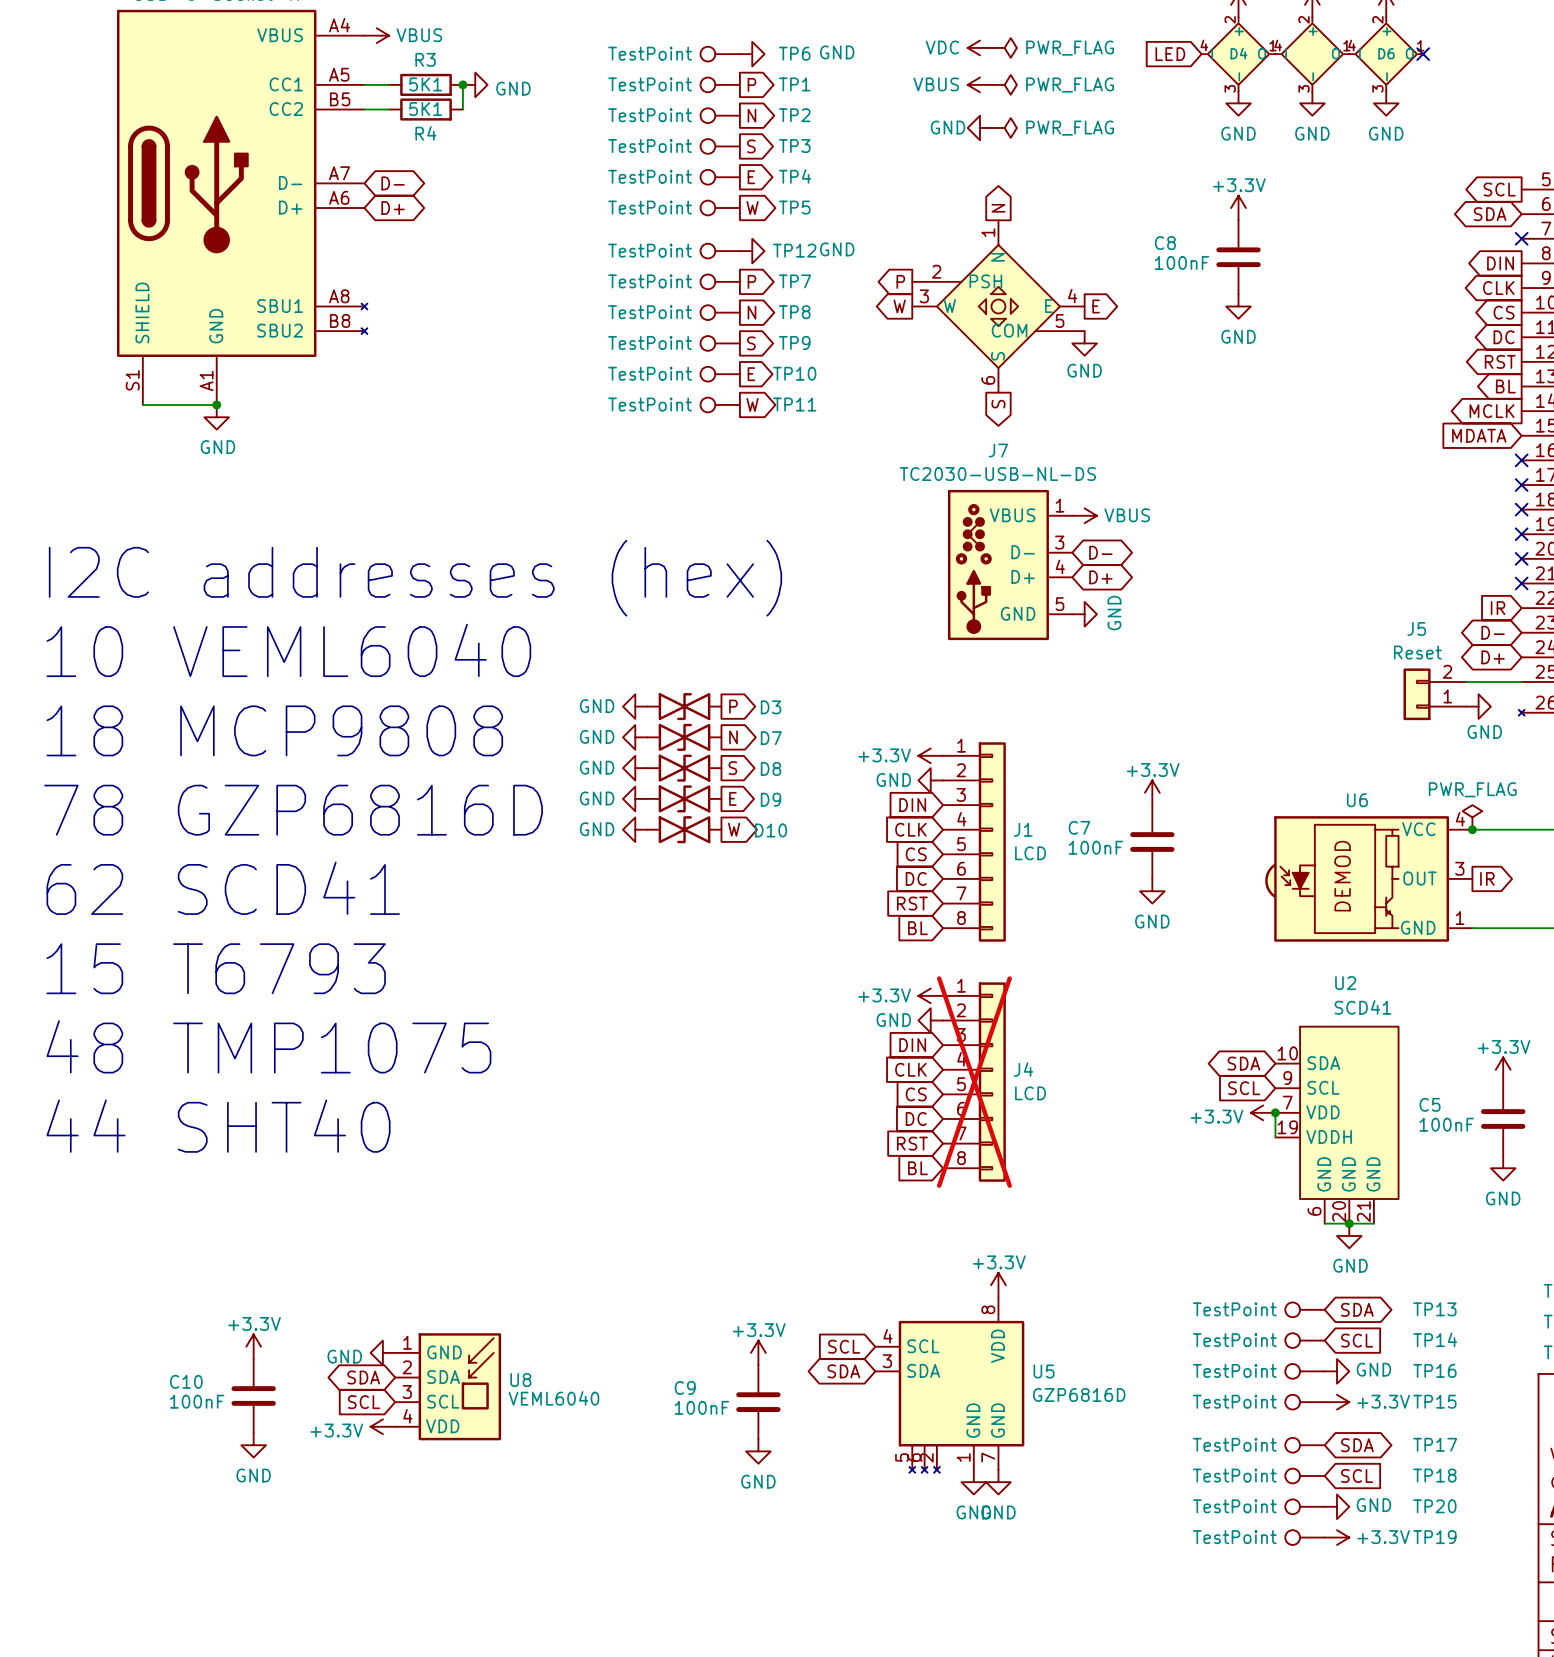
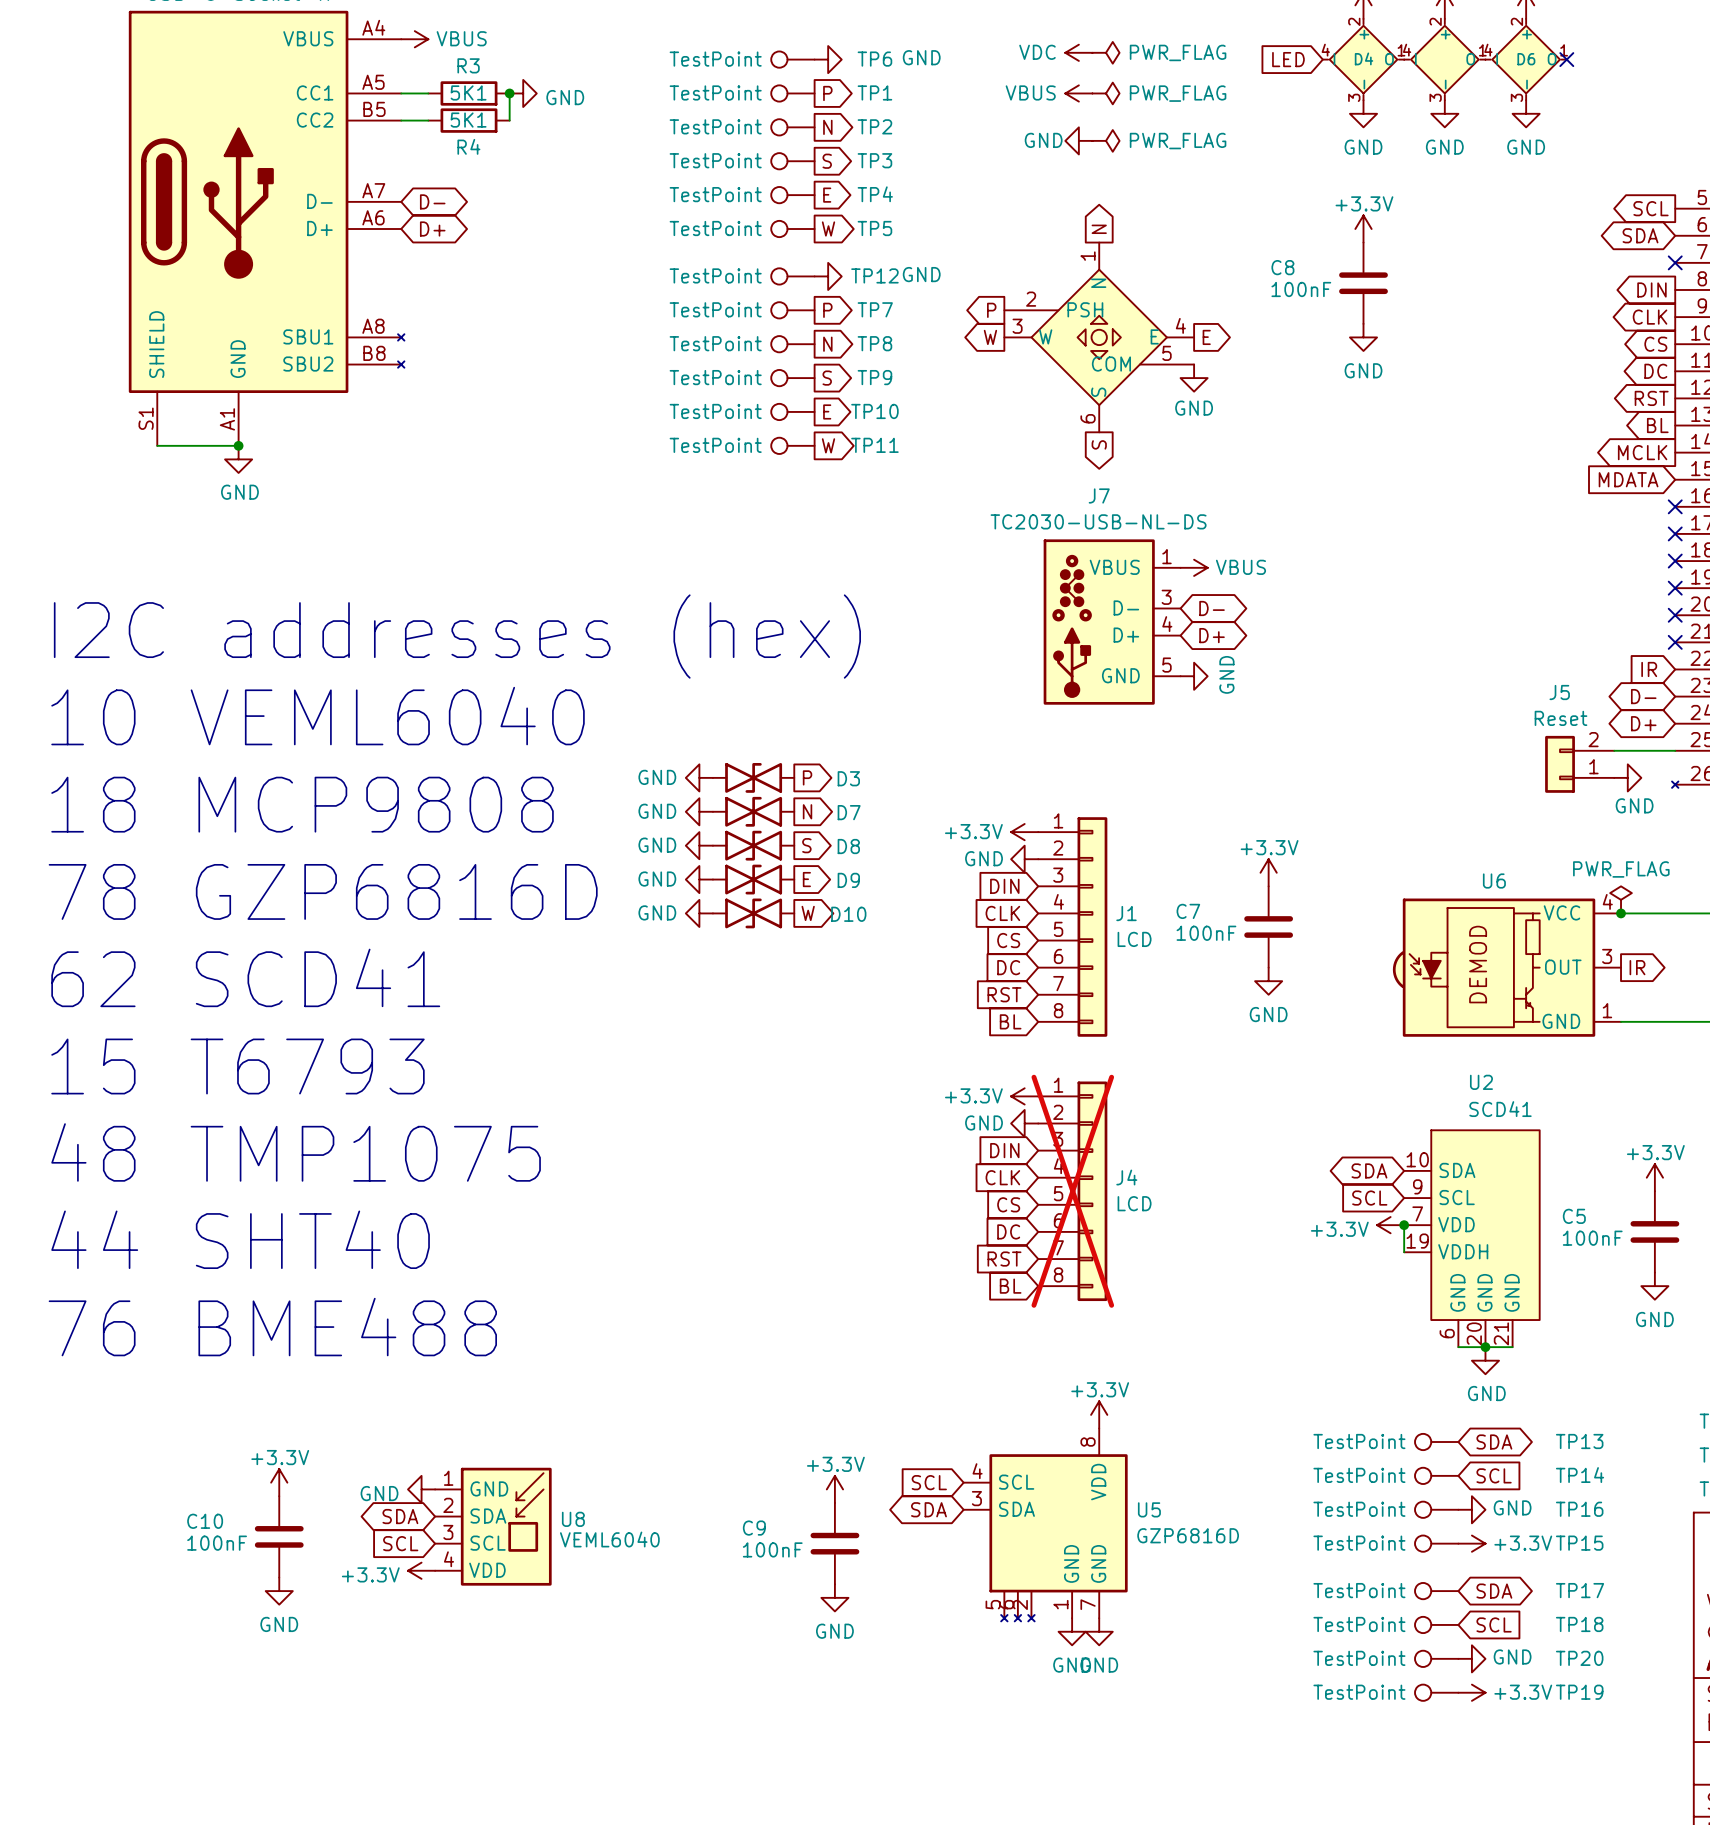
text: none -> 76 BME488 (272, 1327)

